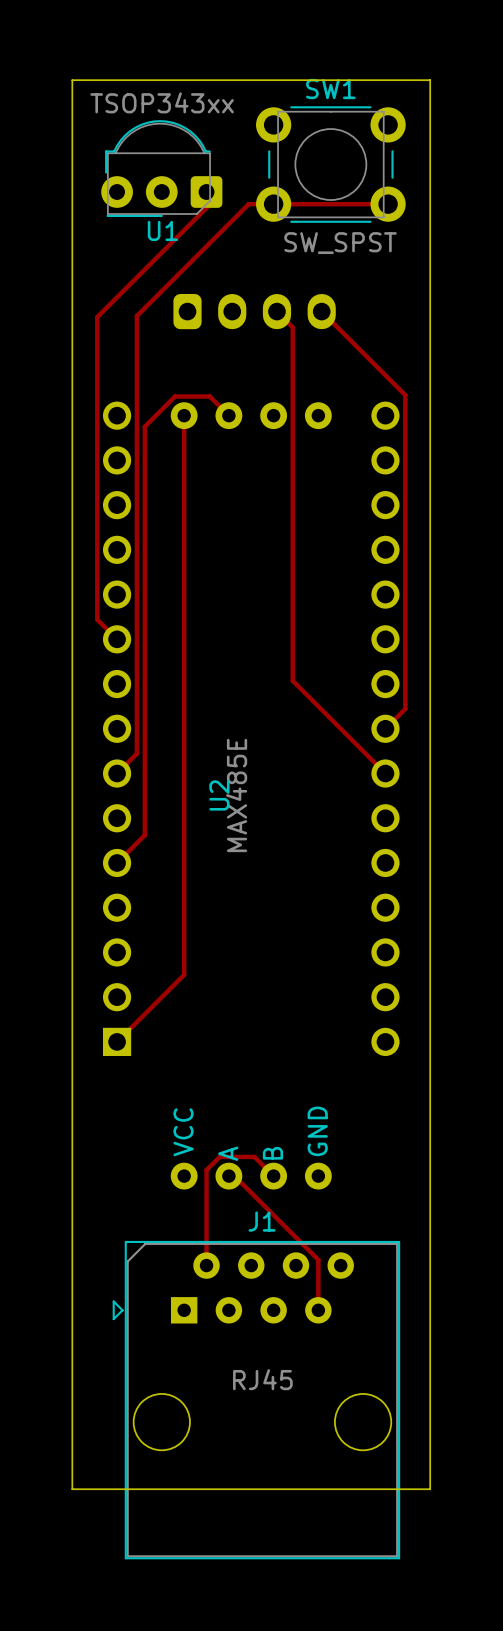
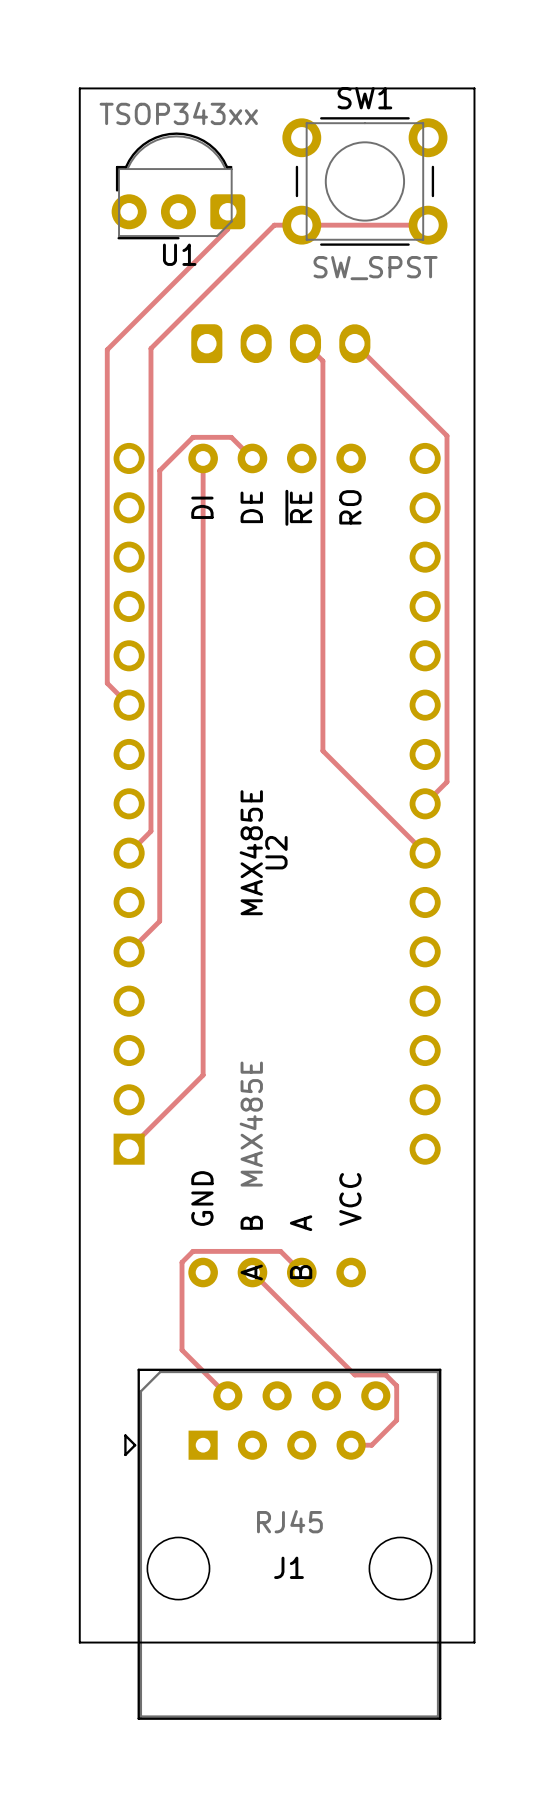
U2 footprint: [170, 402, 332, 1190] -> [188, 443, 366, 1288]
U2 value position: MAX485E (236, 795) -> MAX485E (251, 1124)
text: GND (317, 1131) -> none
text: VCC (183, 1132) -> none
track: (228, 1176) (234, 1176) (318, 1259) (318, 1310) -> (252, 1272) (354, 1374) (385, 1374) (396, 1385) (396, 1420) (371, 1445) (351, 1445)
track: (273, 1176) (254, 1156) (219, 1156) (206, 1170) (206, 1265) -> (301, 1272) (280, 1251) (192, 1251) (182, 1262) (182, 1350) (227, 1395)
J1 name position: J1 (262, 1221) -> J1 (289, 1567)

